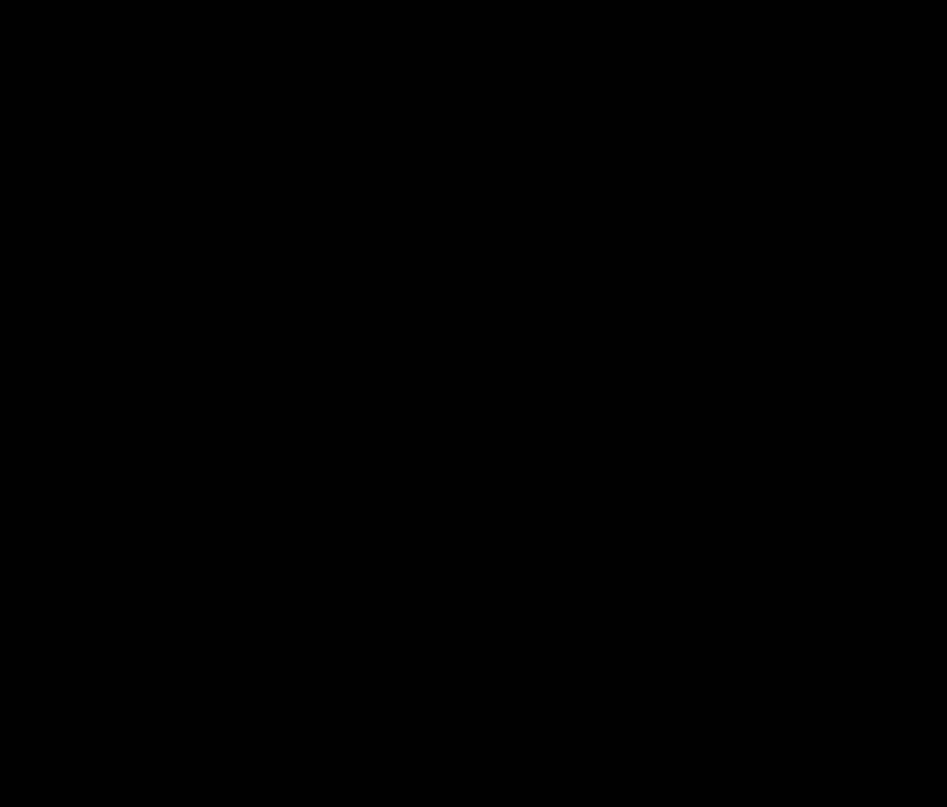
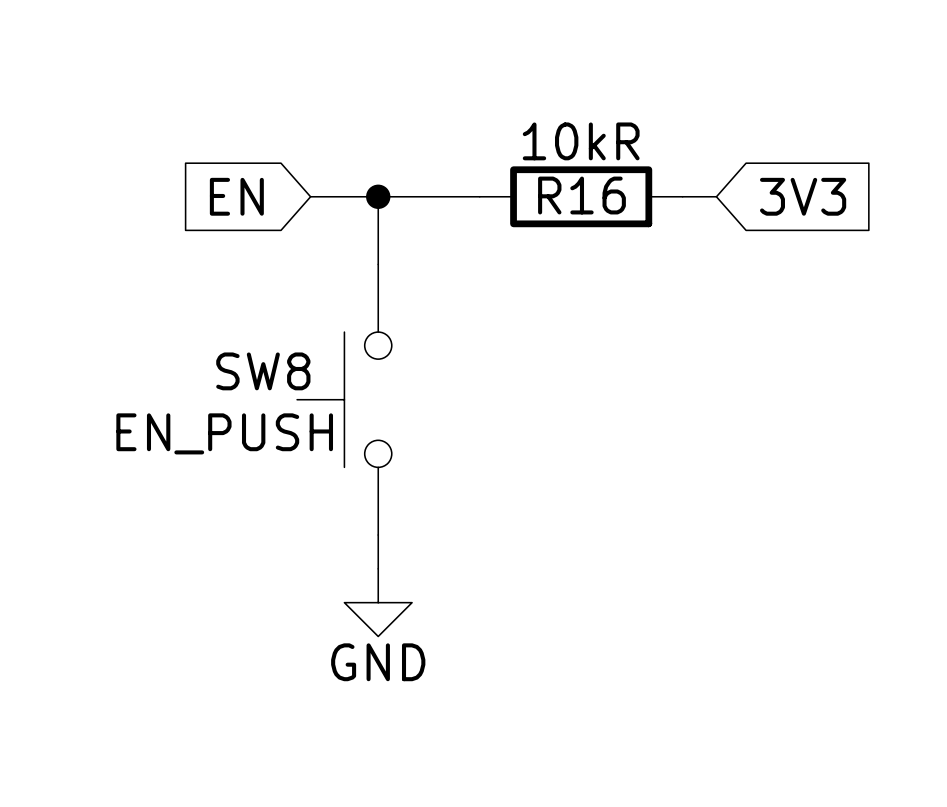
global label: none -> EN (236, 196)
wire: none -> (310, 196) (479, 196)
wire: none -> (378, 196) (378, 264)
junction: none -> (378, 196)
R16: none -> 10kR (581, 196)
wire: none -> (682, 196) (716, 196)
global label: none -> 3V3 (803, 196)
SW8: none -> EN_PUSH (344, 399)
wire: none -> (378, 535) (378, 568)
power symbol: none -> GND (378, 602)

